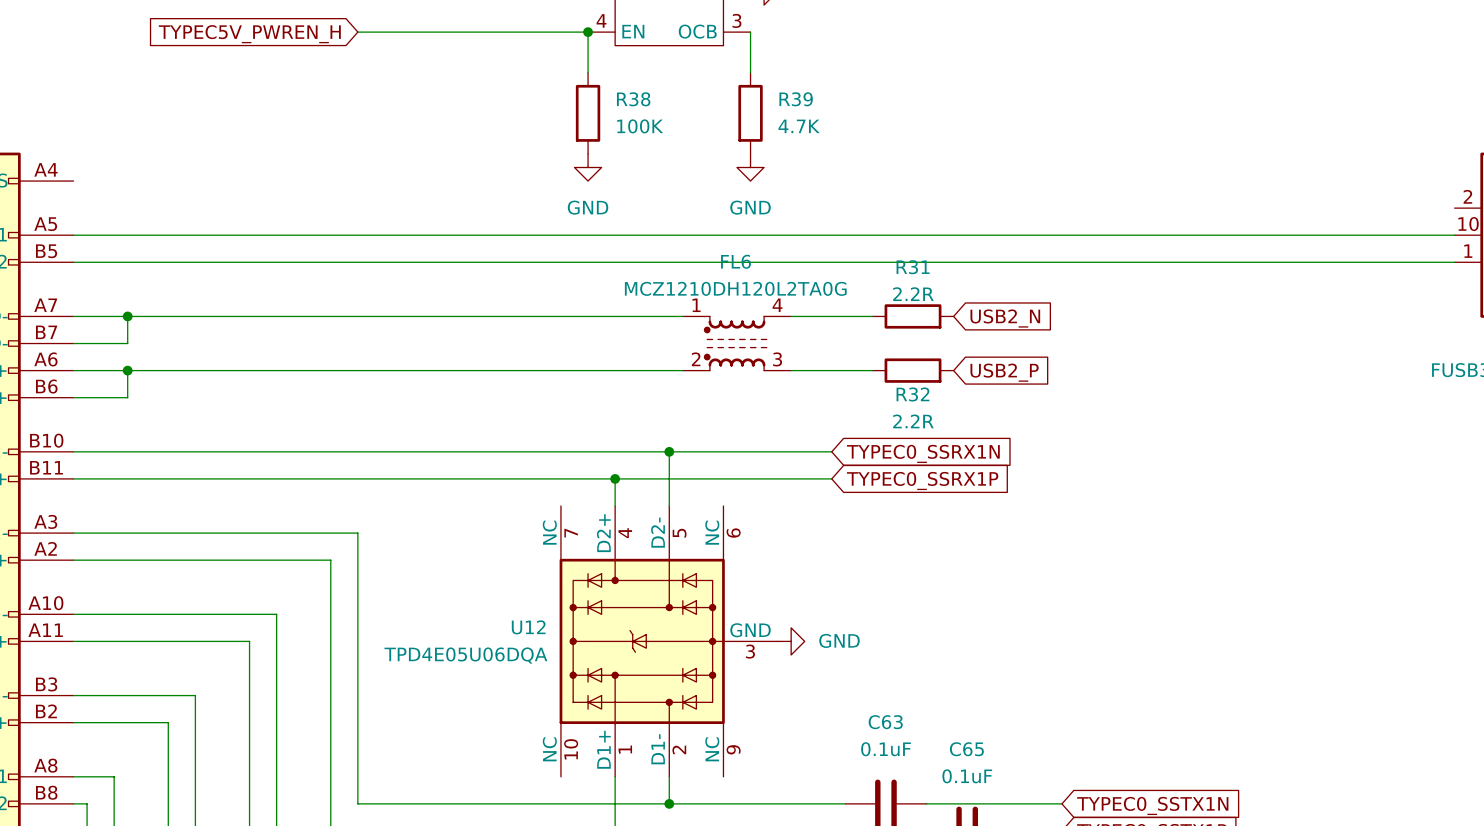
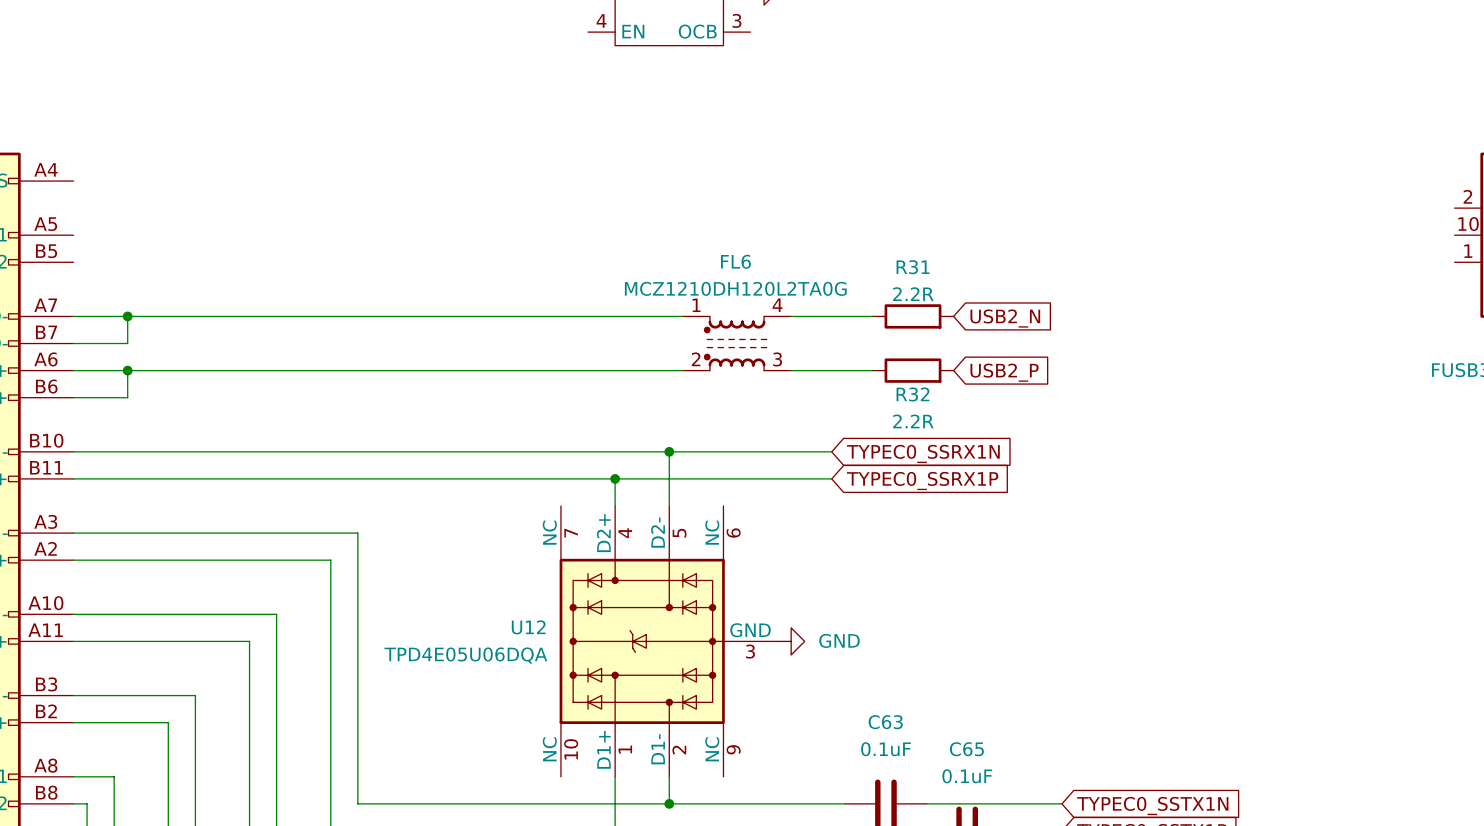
wire: (357, 32) (588, 32) (588, 72) -> none
junction: (588, 32) -> none
wire: (750, 32) (750, 72) -> none
global label: TYPEC5V_PWREN_H (249, 34) -> none
R38: 100K (588, 113) -> none
R39: 4.7K (750, 113) -> none
power symbol: GND (588, 167) -> none
power symbol: GND (750, 167) -> none
wire: (73, 235) (1454, 235) -> none
wire: (73, 262) (1454, 262) -> none

